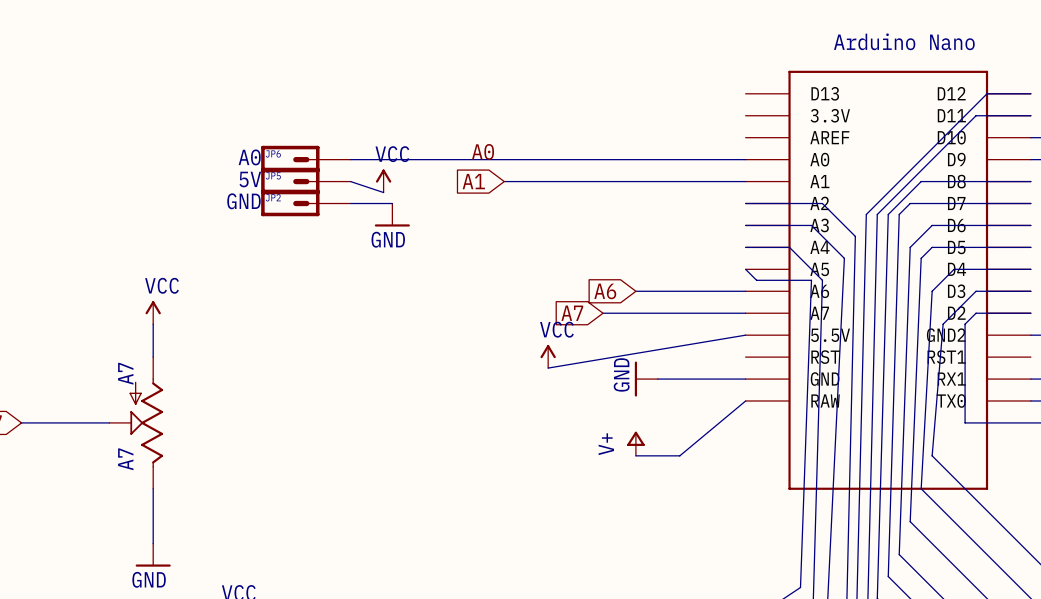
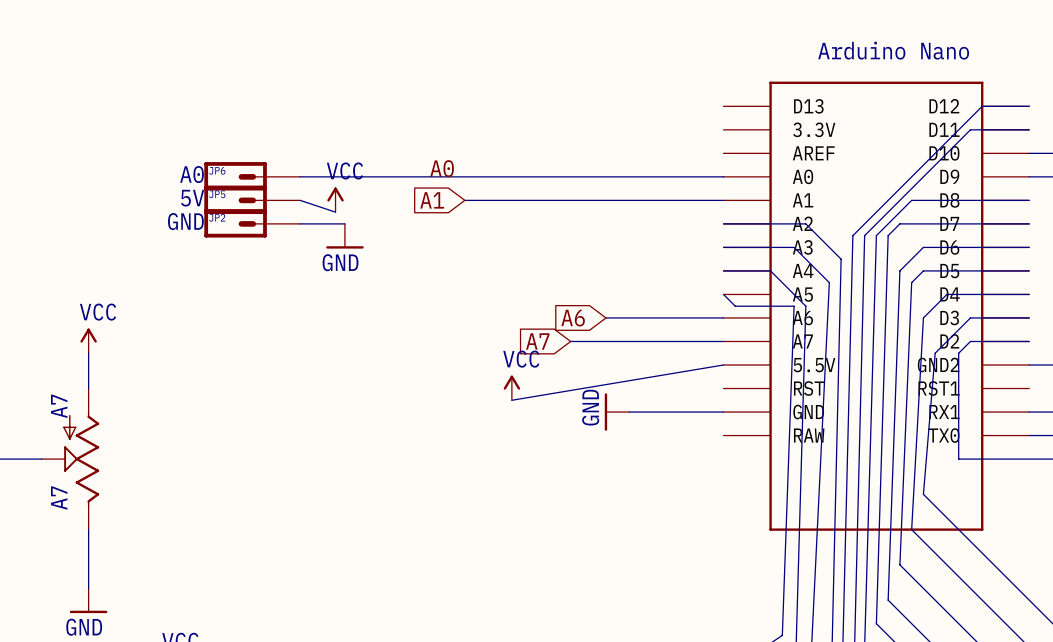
wire: (745, 400) (679, 455) (635, 455) -> none
power symbol: V+ (635, 443) -> none

